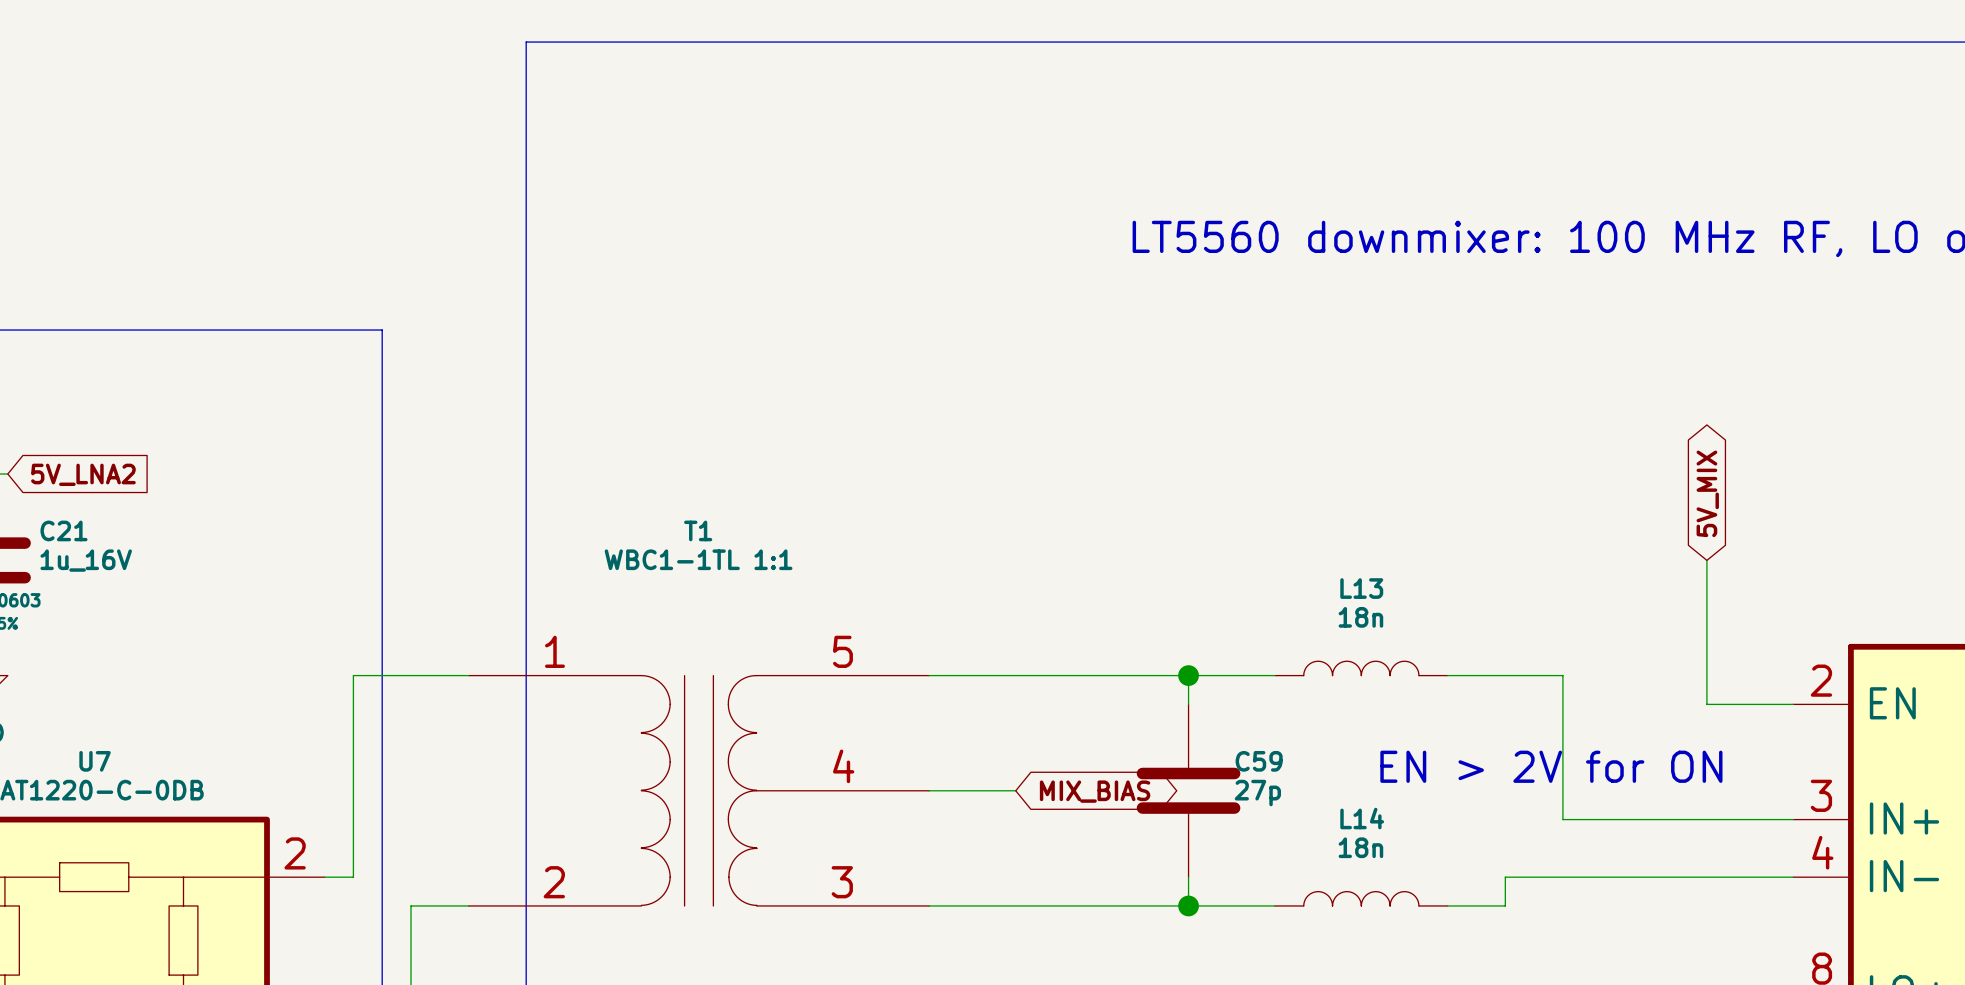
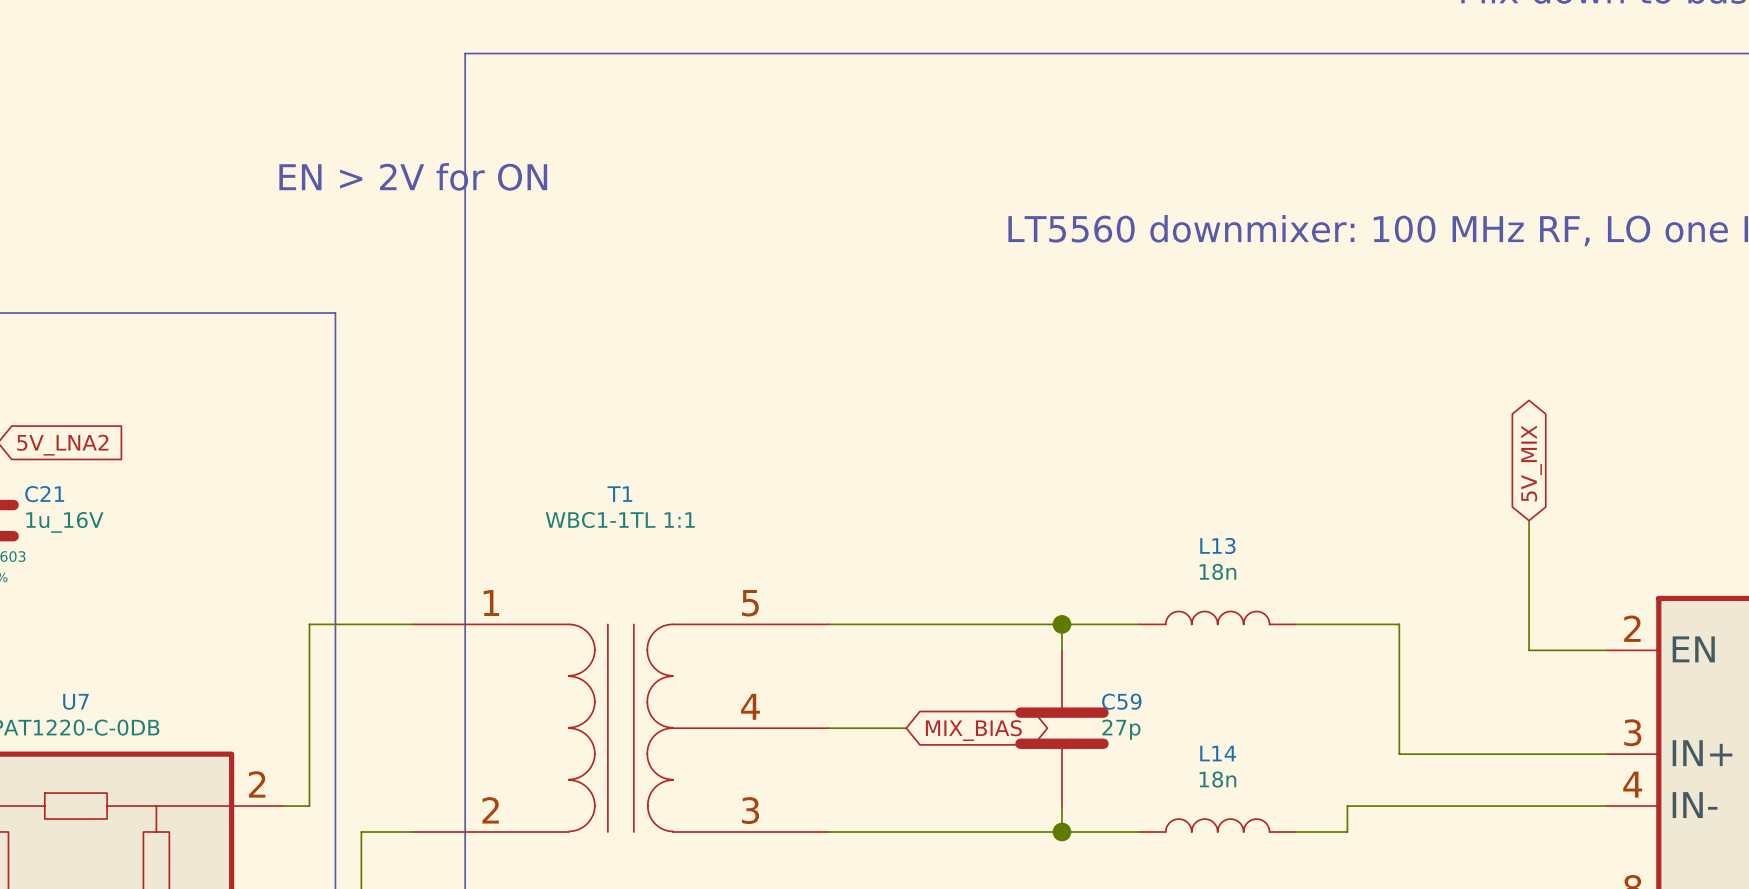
text: none -> EN > 2V for ON (413, 176)
text: EN > 2V for ON (1551, 766) -> none

